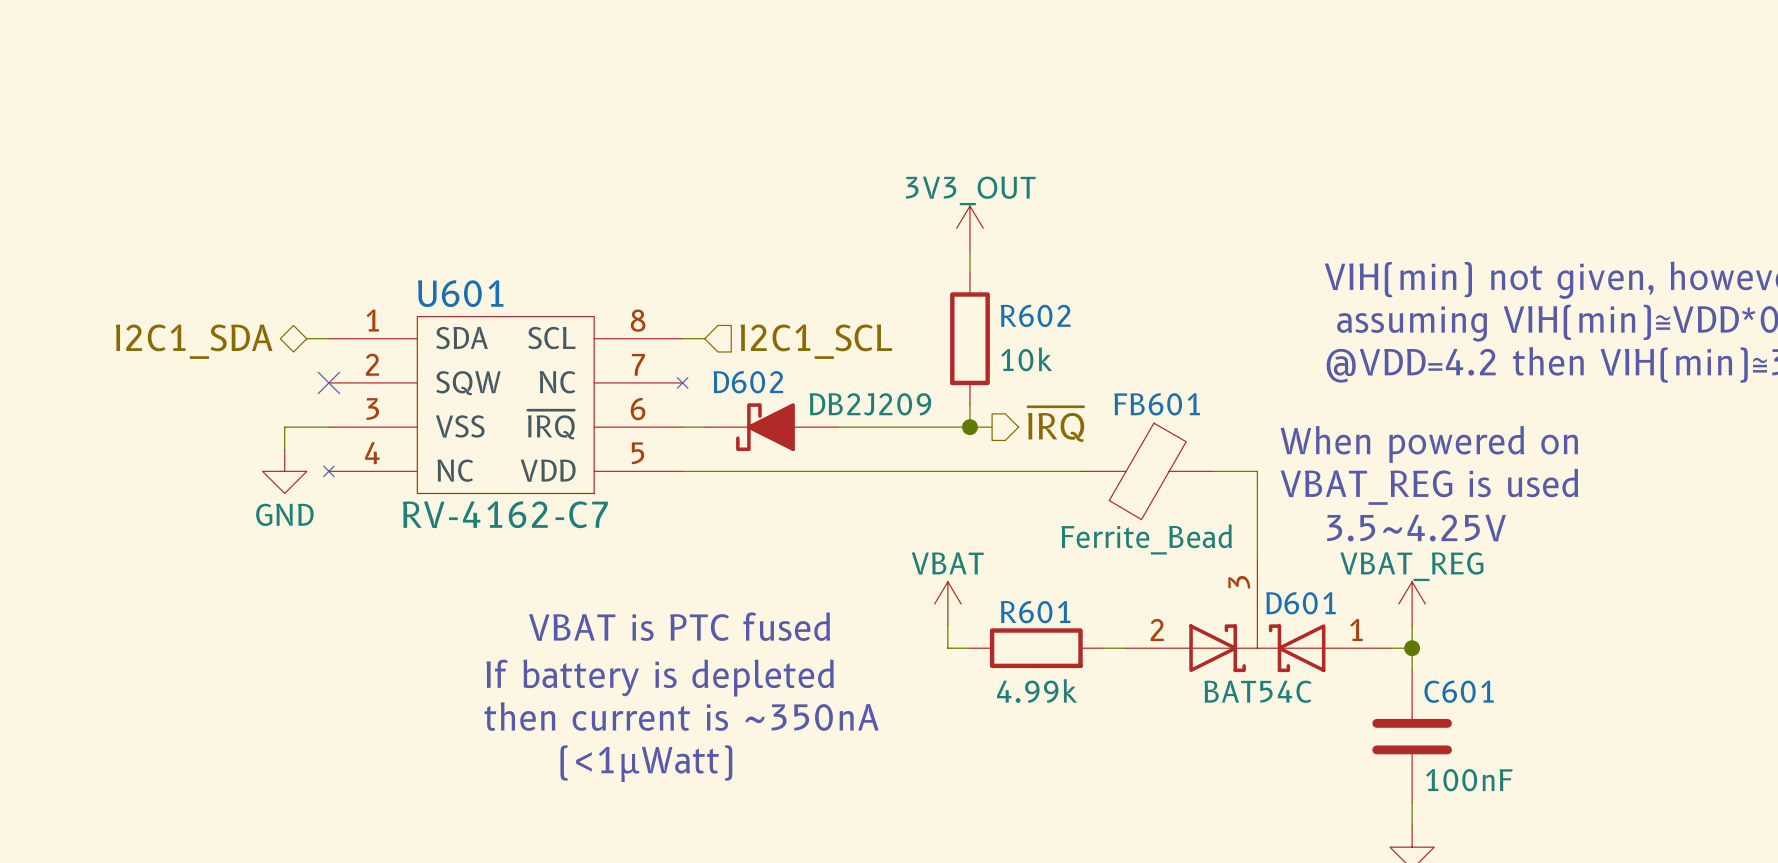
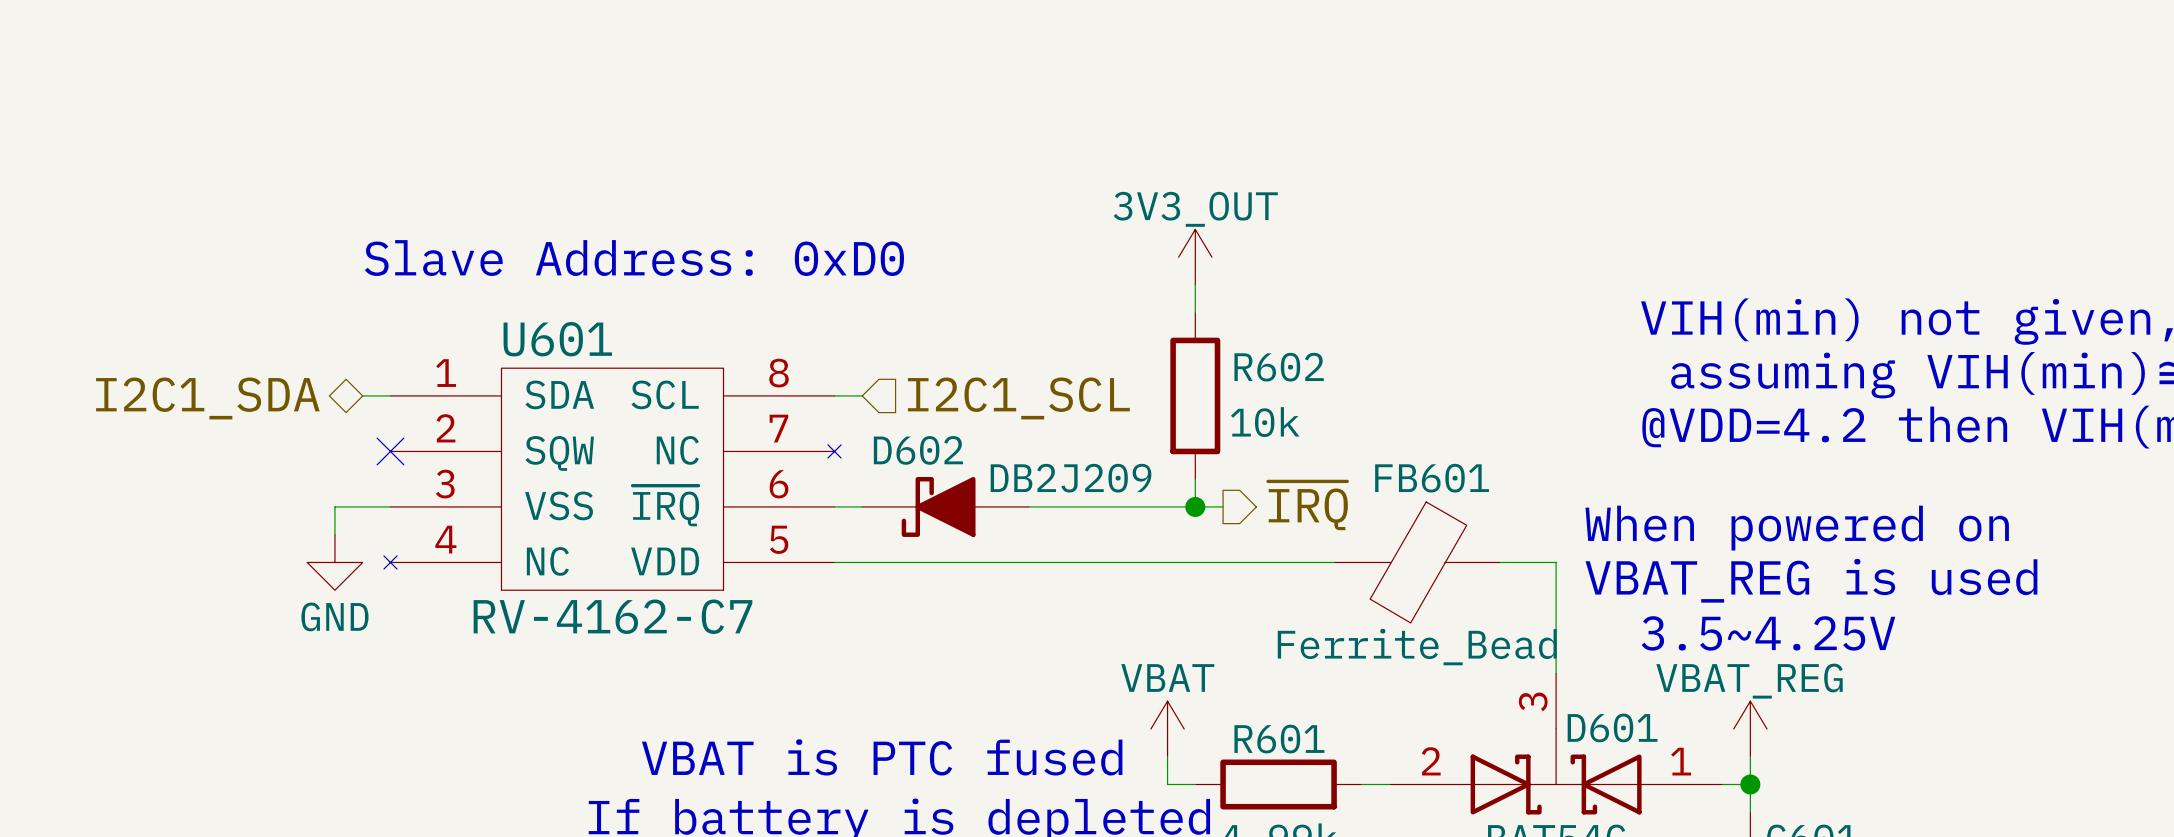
text: none -> Slave Address: 0xD0 (634, 258)

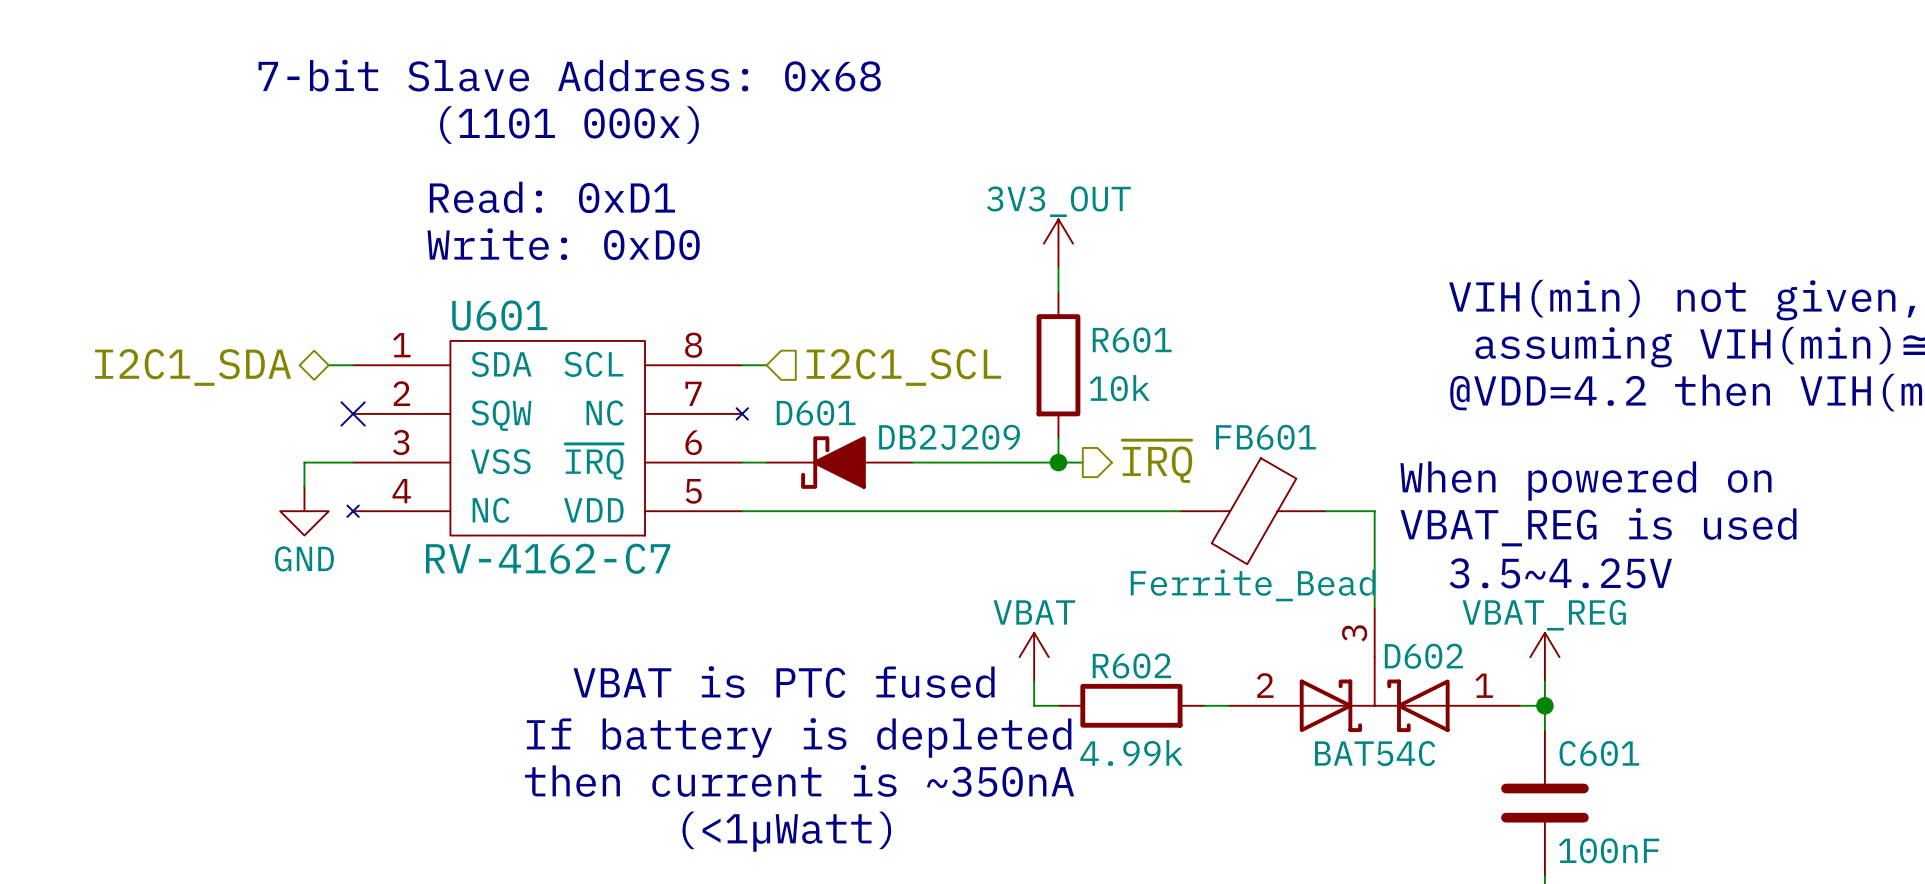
text: none -> 7-bit Slave Address: 0x68 (569, 75)
text: none -> (1101 000x) (569, 125)
text: none -> Read: 0xD1 (552, 197)
text: none -> Write: 0xD0 (563, 244)
text: Slave Address: 0xD0 (634, 258) -> none
R602 name: R602 (1279, 367) -> R601 (1132, 340)
D602 name: D602 (918, 450) -> D601 (816, 413)
D601 name: D601 (1612, 727) -> D602 (1423, 656)
R601 name: R601 (1279, 739) -> R602 (1131, 665)

